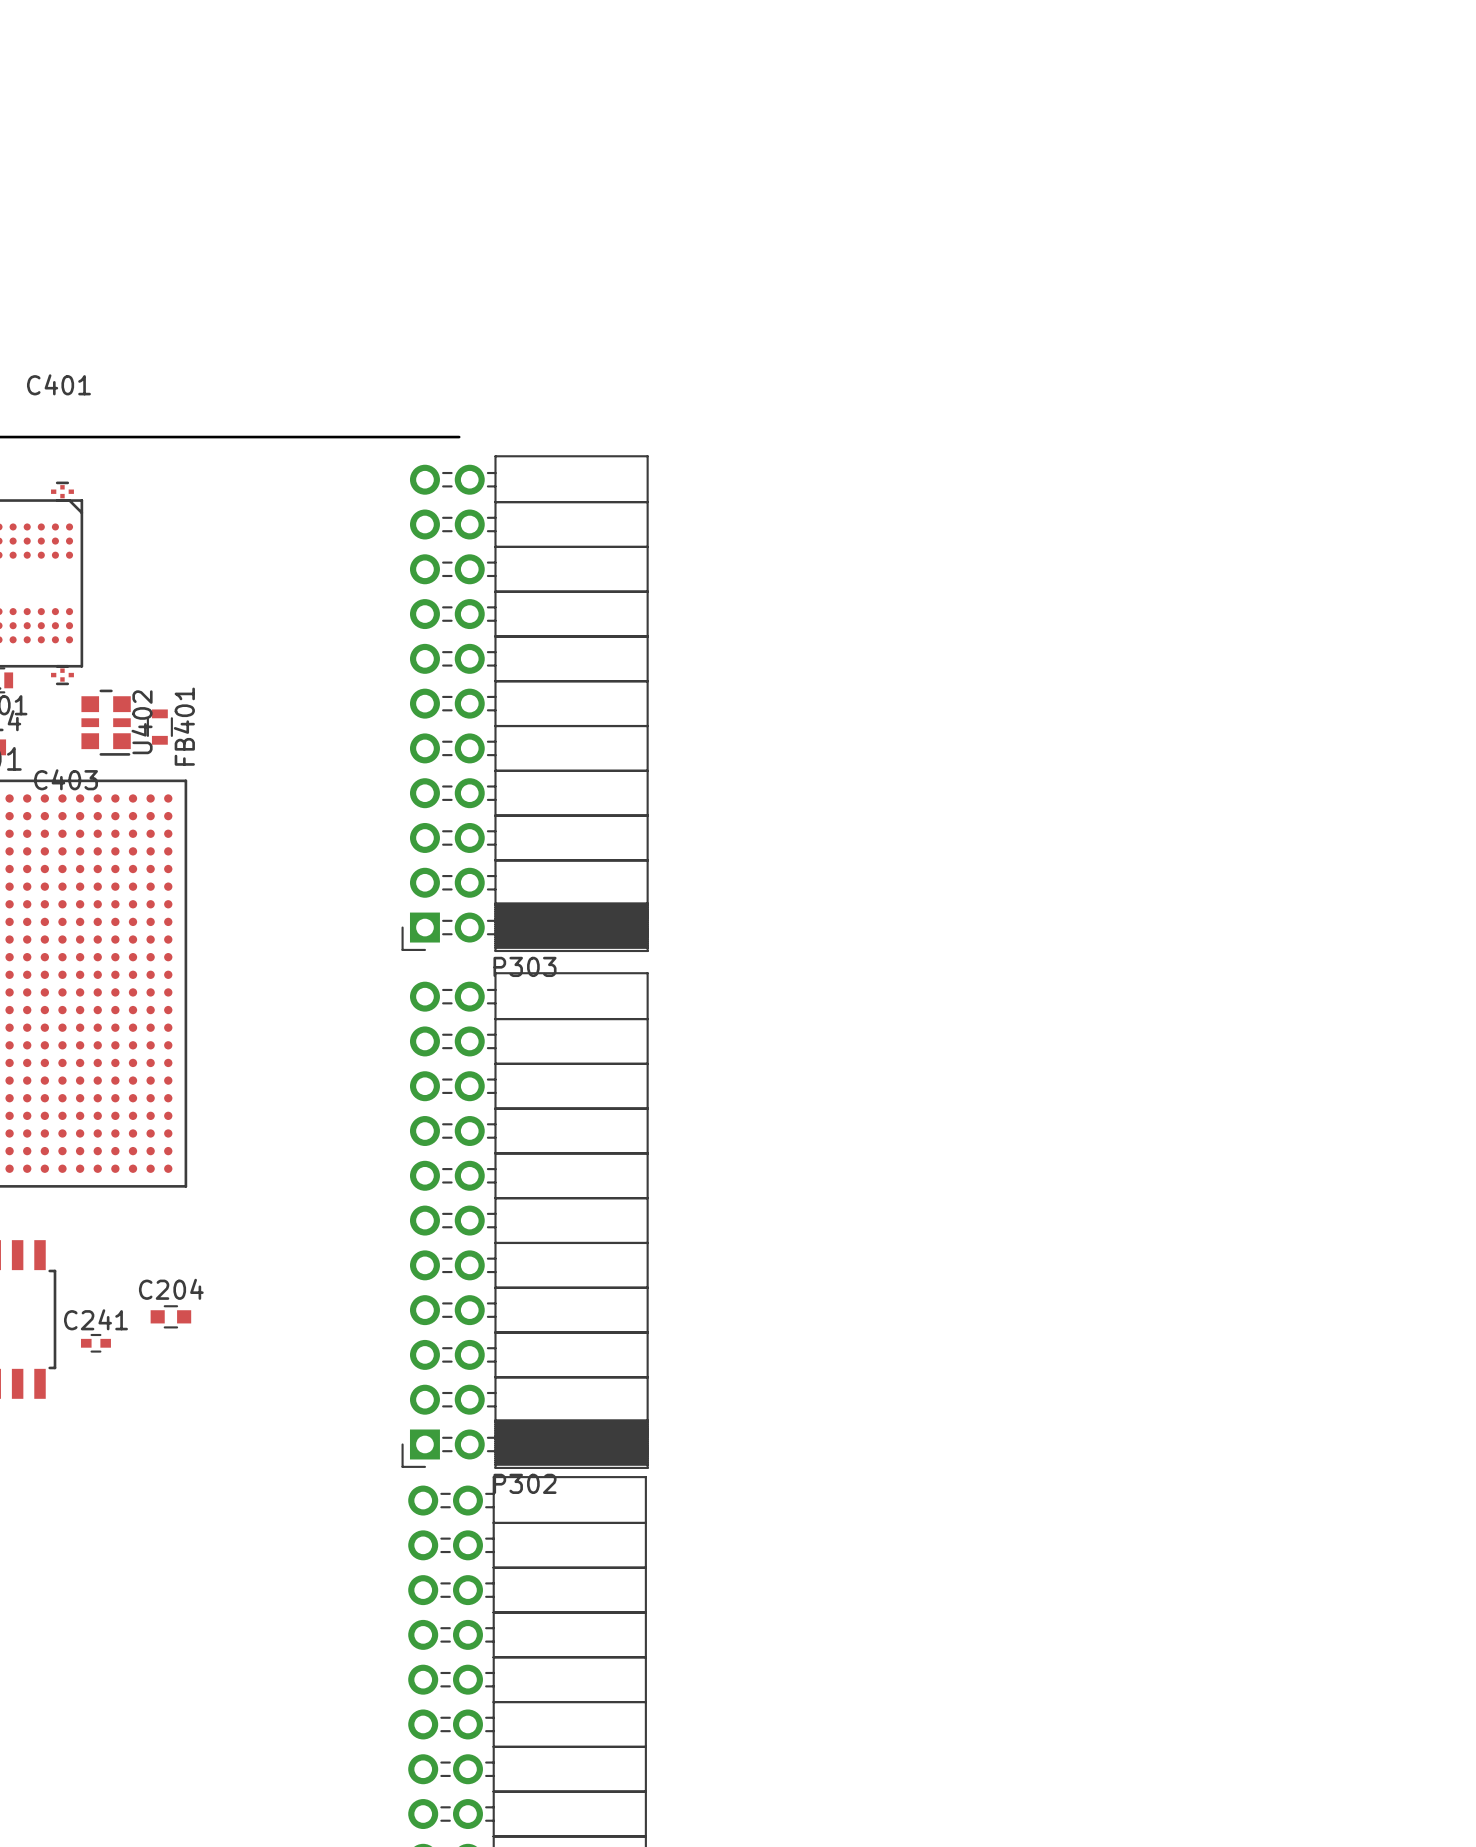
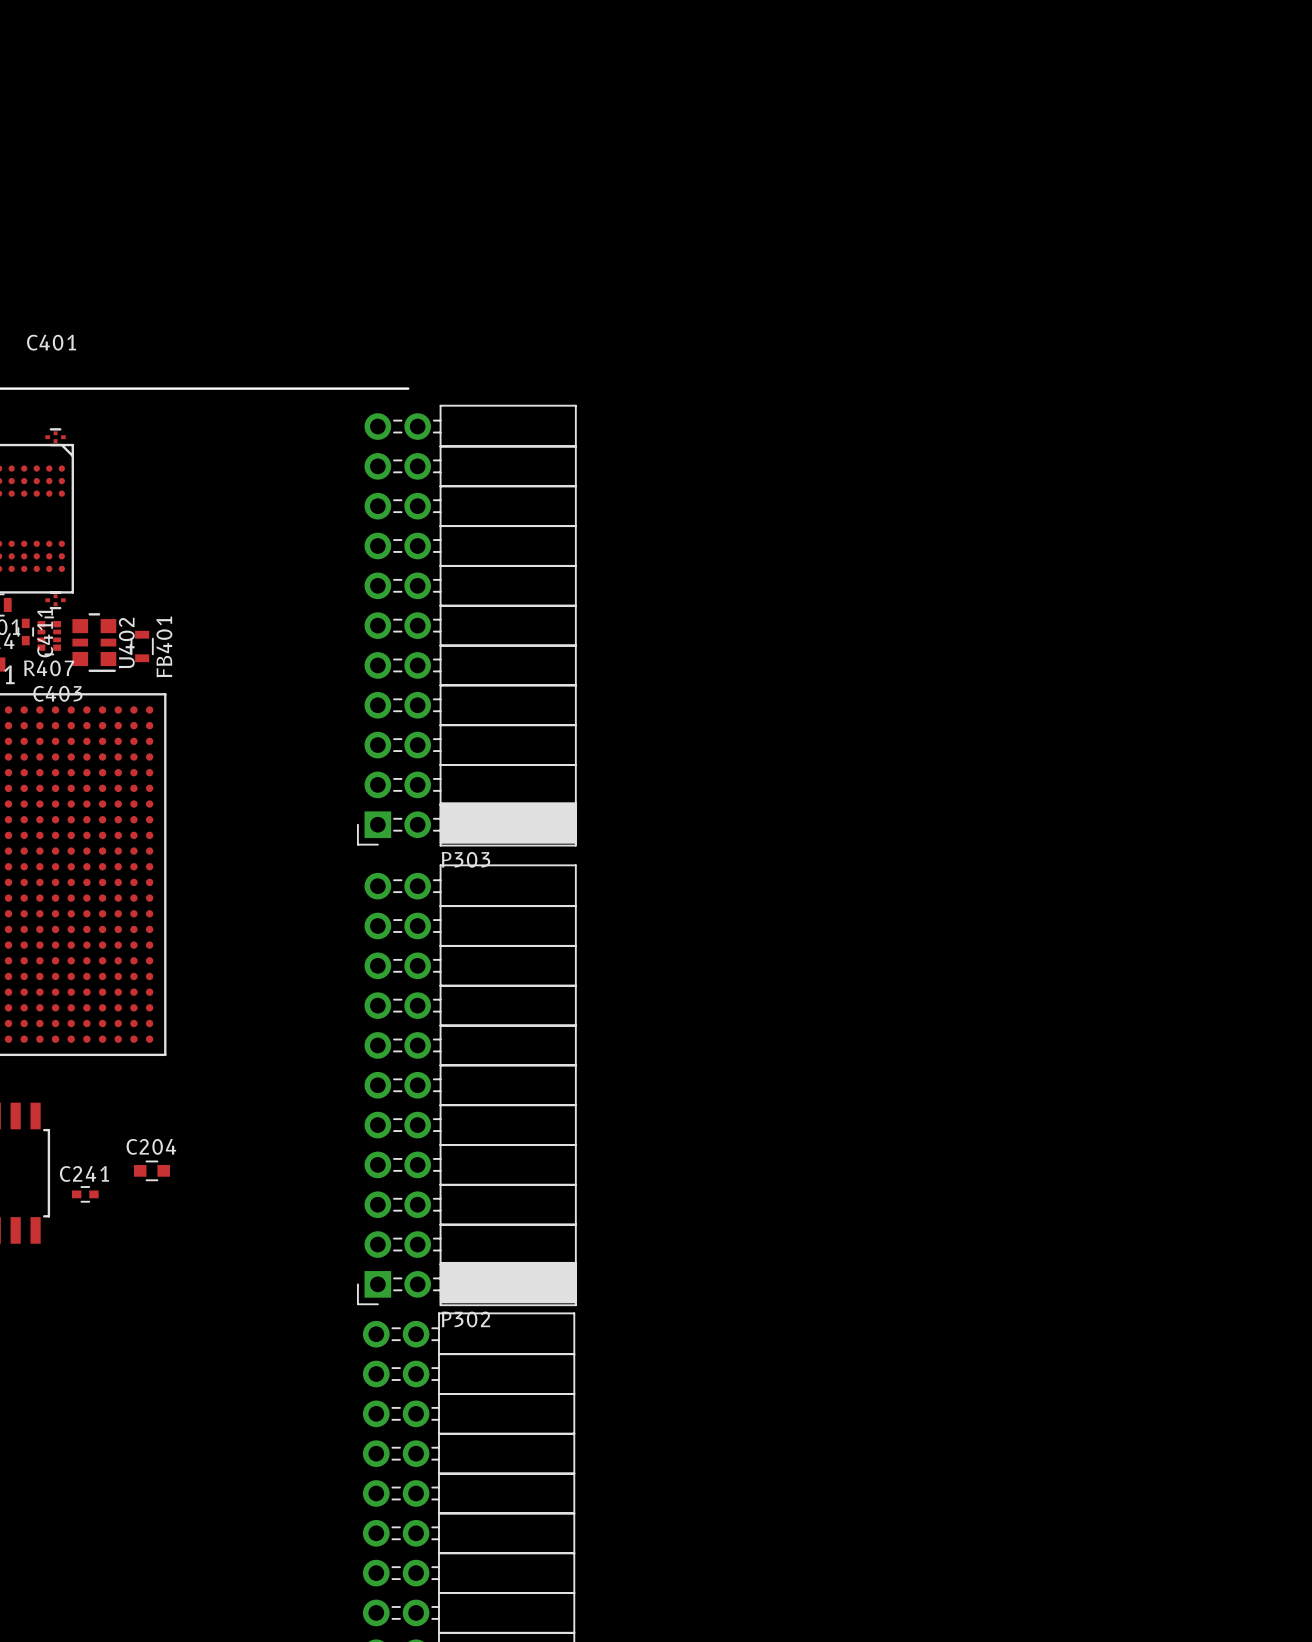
C411: none -> (25, 631)
R407: none -> (49, 635)

